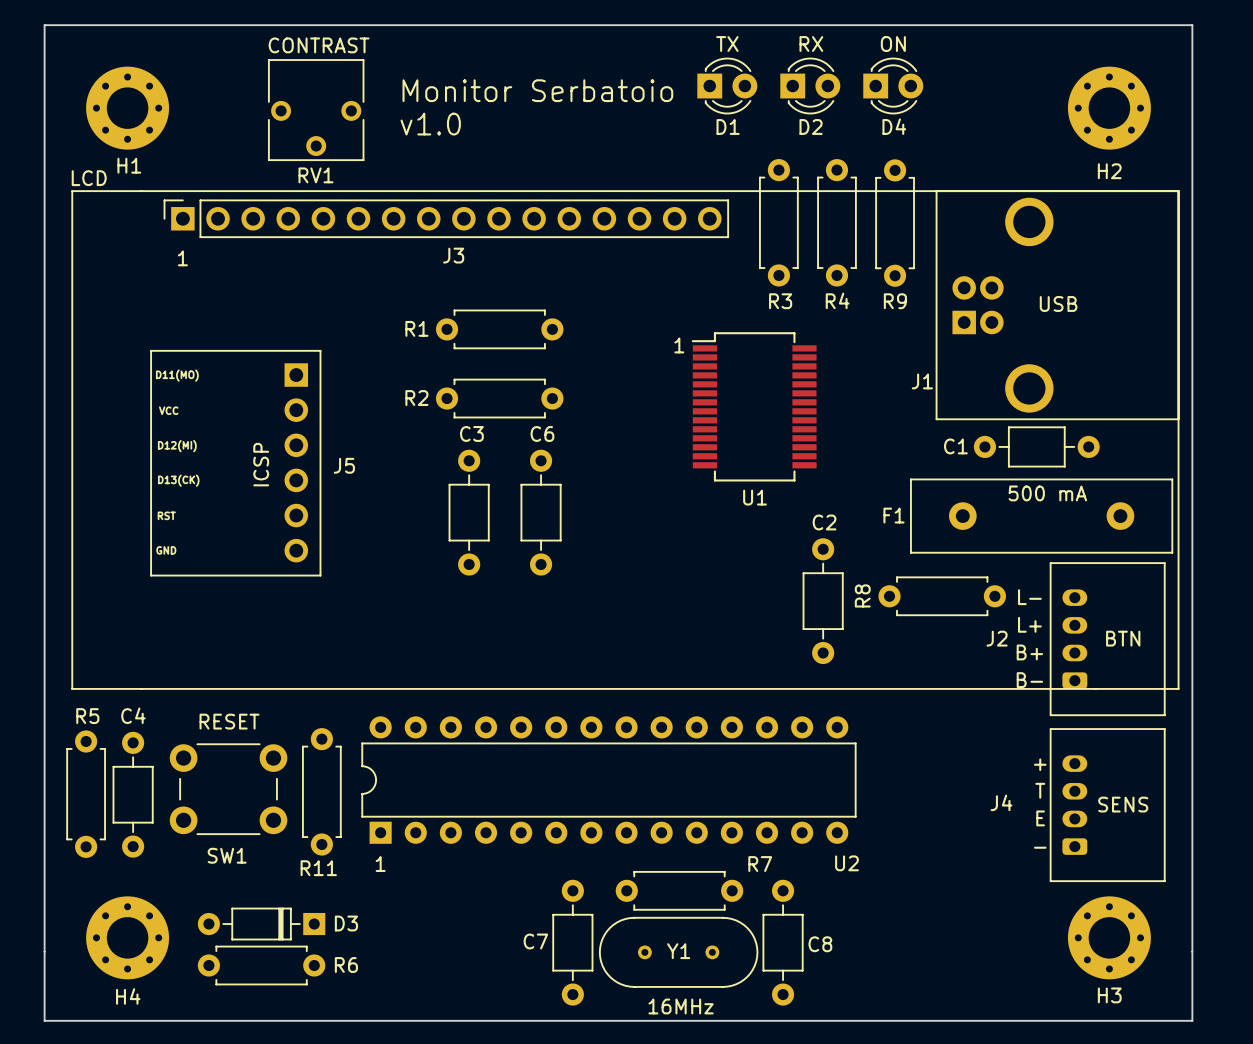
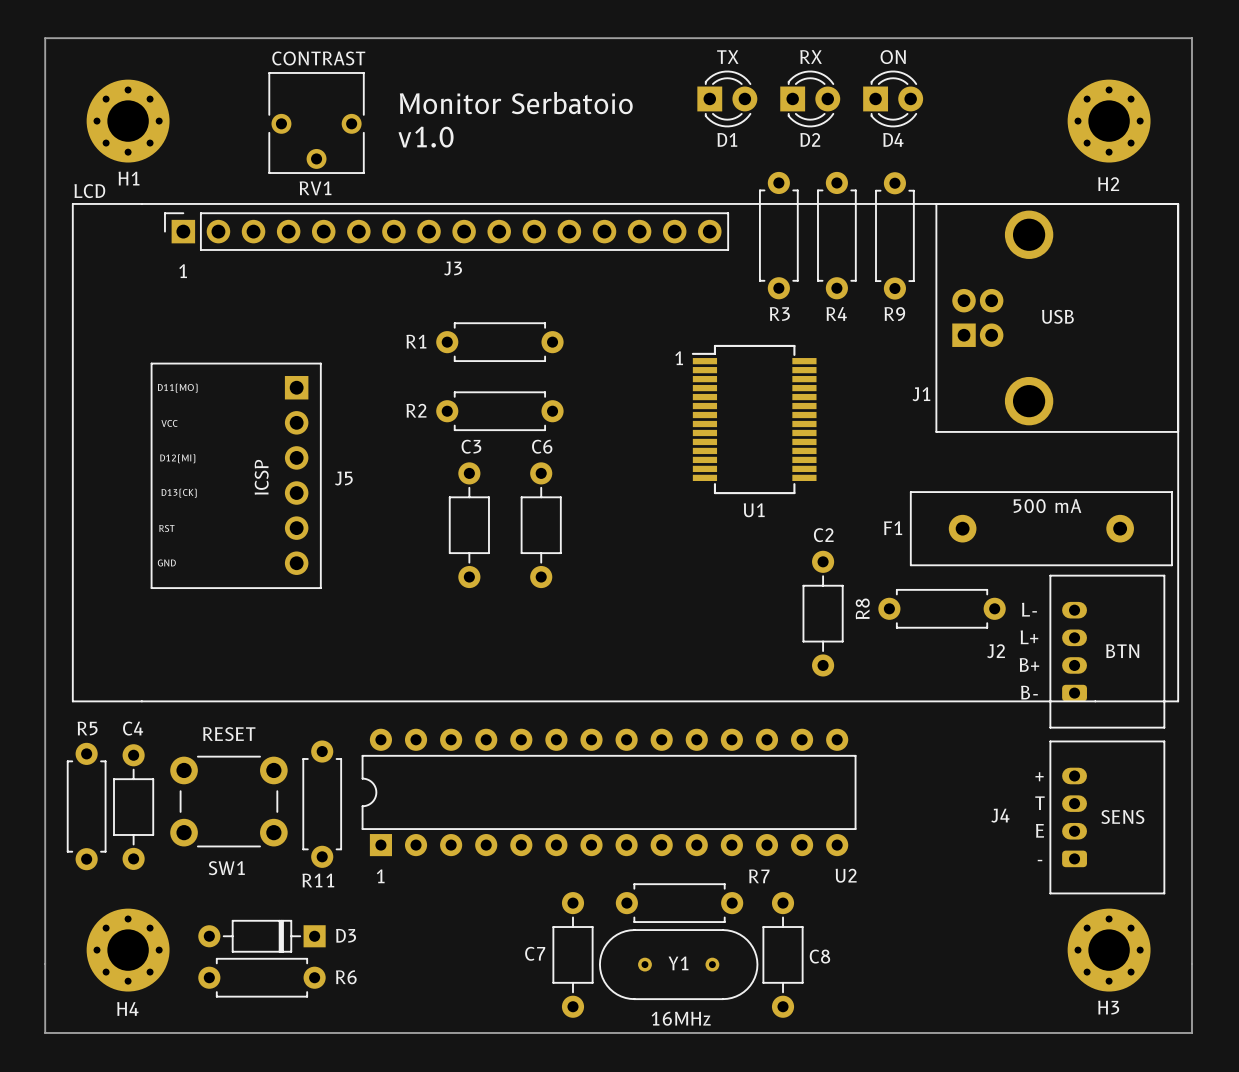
C1: (1036, 446) -> none

